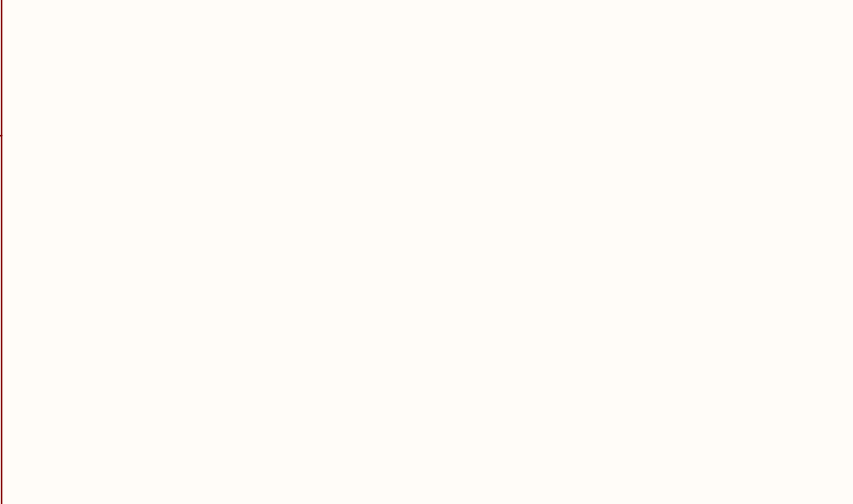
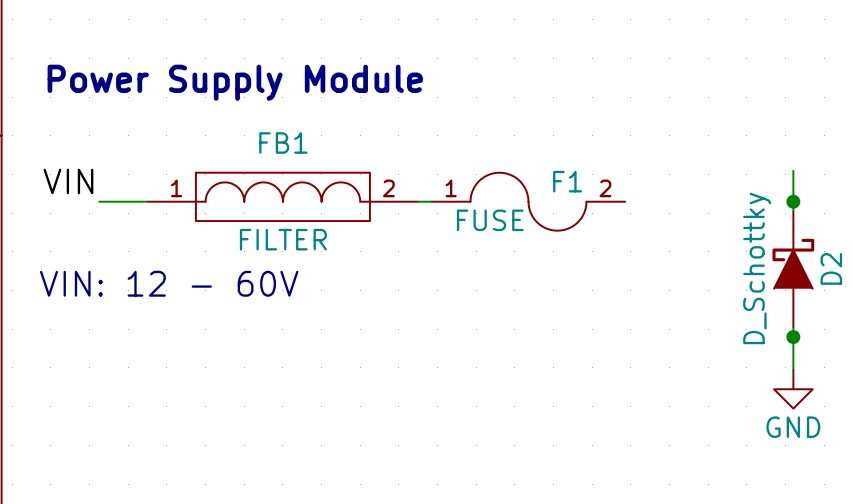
text: none -> Power Supply Module (235, 82)
wire: none -> (793, 170) (793, 211)
label: none -> VIN (68, 181)
FB1: none -> FILTER (282, 196)
wire: none -> (99, 201) (147, 201)
wire: none -> (418, 201) (431, 201)
F1: none -> FUSE (528, 201)
junction: none -> (793, 201)
D2: none -> D_Schottky (793, 269)
text: none -> VIN: 12 - 60V (169, 283)
wire: none -> (793, 327) (793, 369)
junction: none -> (793, 337)
power symbol: none -> GND (793, 389)

